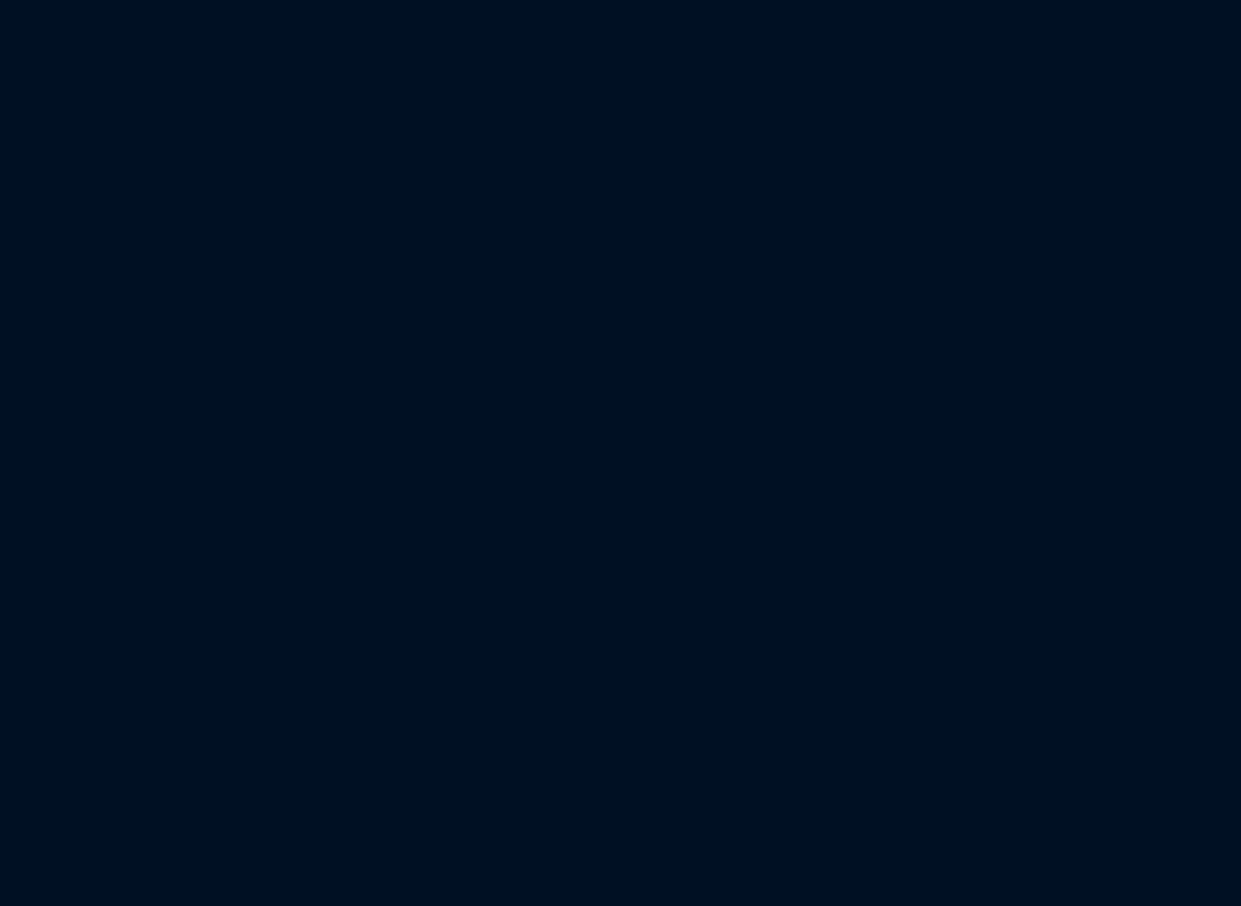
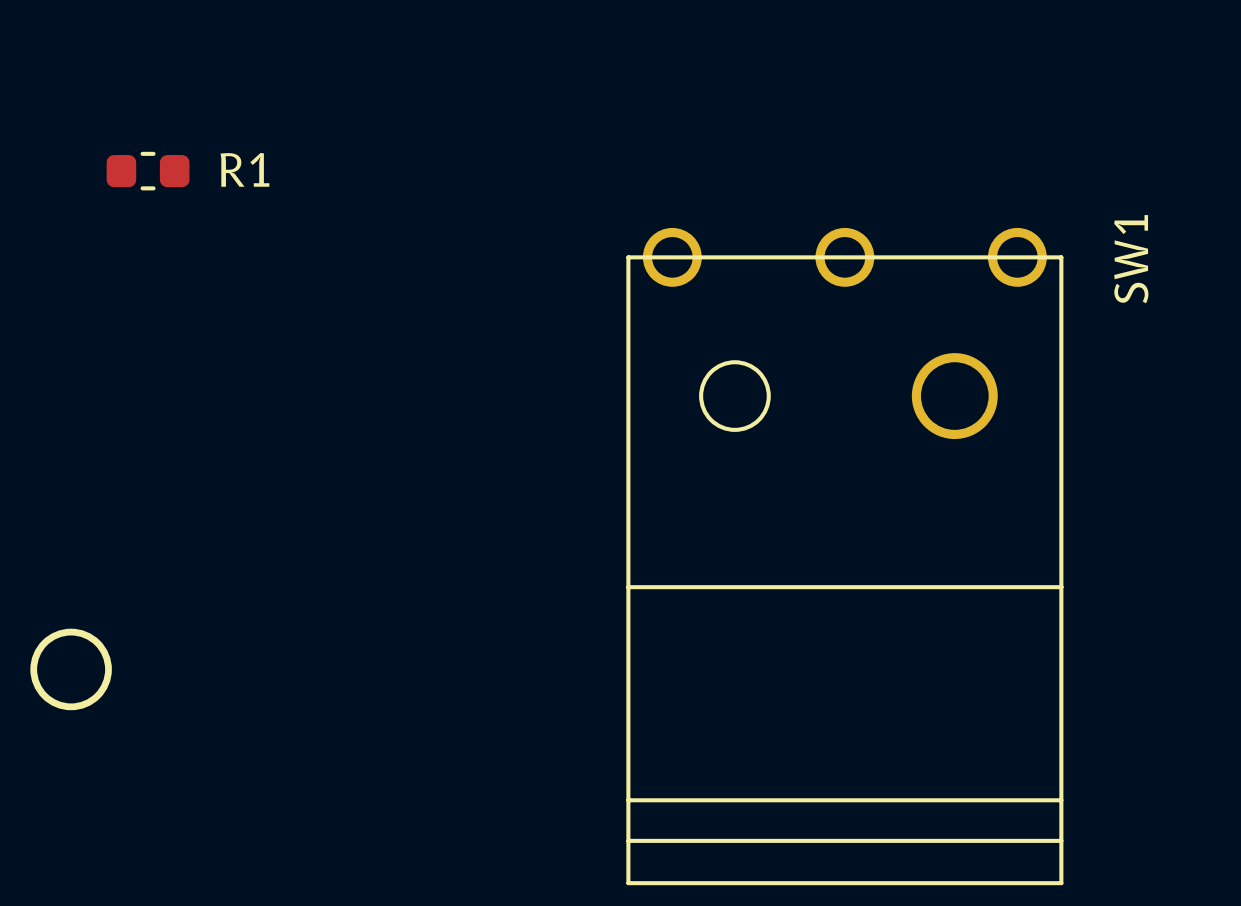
R1: none -> (148, 171)
SW1: none -> (844, 556)
drawing: none -> [30, 628, 112, 711]

